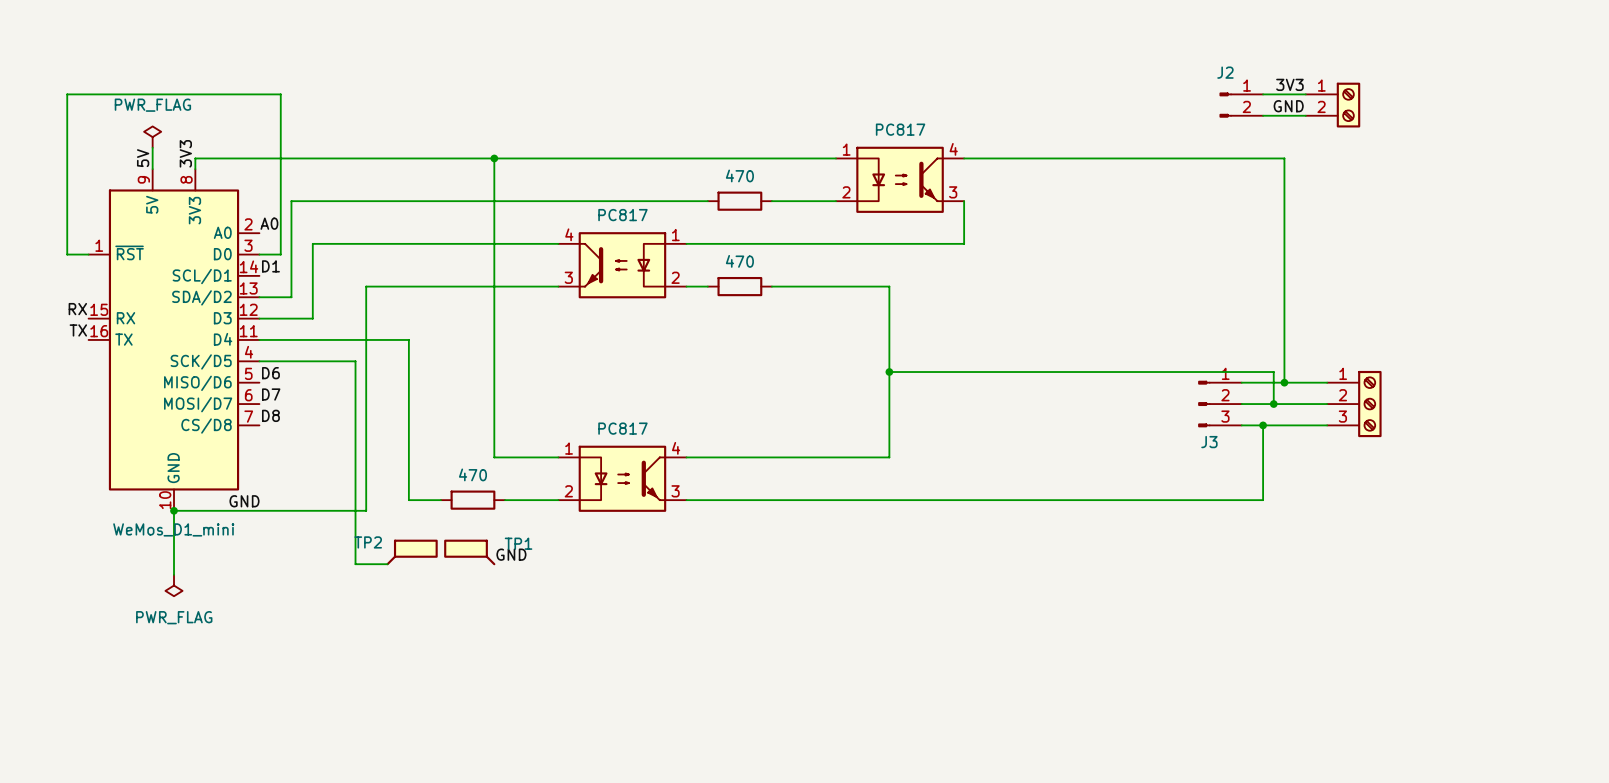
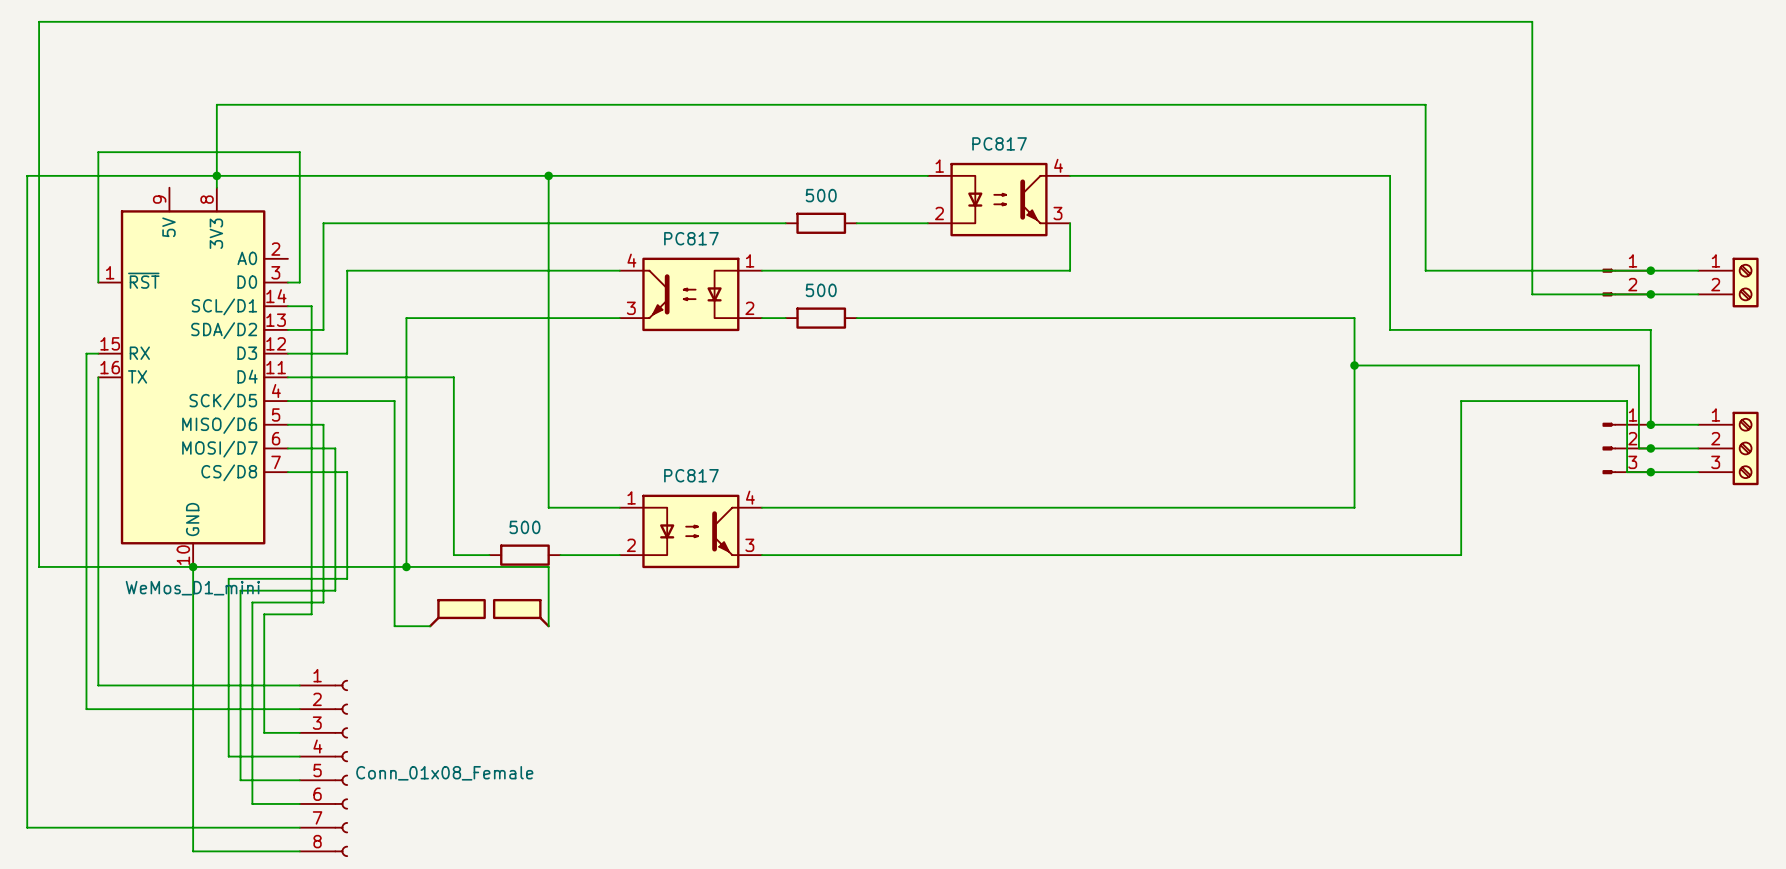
label: 3V3 (1289, 84) -> none
wire: (195, 94) (67, 94) (67, 254) (88, 254) -> (299, 282) (299, 152) (98, 152) (98, 282)
wire: none -> (216, 104) (216, 175) (27, 175) (27, 827) (299, 827)
wire: (280, 94) (280, 254) (270, 254) -> (311, 104) (1401, 104)
wire: (1284, 94) (1305, 94) -> (1425, 104) (1425, 175)
J2: (1241, 105) -> none
part: (1333, 105) -> none
label: GND (1288, 106) -> none
wire: (1263, 115) (1305, 115) -> none
power symbol: PWR_FLAG (152, 137) -> none
wire: (152, 147) (152, 169) -> none
label: 3V3 (185, 153) -> none
label: 5V (143, 158) -> none
junction: none -> (216, 175)
wire: (1252, 158) (1284, 158) -> (1390, 175) (1390, 329) (1650, 329) (1650, 424) (1698, 424)
part value: 470 (739, 175) -> 500 (821, 195)
label: A0 (269, 223) -> none
wire: (1284, 243) (1284, 382) -> (1425, 270) (1698, 270)
junction: none -> (1650, 270)
part: none -> (1626, 282)
part: none -> (1728, 282)
part value: 470 (739, 261) -> 500 (821, 290)
junction: none -> (1650, 294)
wire: none -> (1698, 294) (1532, 294) (1532, 21) (39, 21) (39, 566) (193, 566)
label: D1 (270, 266) -> none
wire: none -> (287, 306) (311, 306) (311, 614) (264, 614) (264, 732) (299, 732)
wire: (889, 286) (889, 457) -> (987, 318) (1354, 318) (1354, 507) (987, 507)
label: RX (77, 309) -> none
wire: none -> (98, 353) (86, 353) (86, 709) (299, 709)
wire: none -> (1354, 365) (1638, 365) (1638, 448) (1698, 448)
junction: none -> (1354, 365)
label: TX (78, 330) -> none
wire: none -> (98, 377) (98, 685) (299, 685)
wire: (889, 372) (1273, 372) (1273, 404) -> none
junction: (889, 372) -> none
label: D6 (270, 373) -> none
wire: none -> (287, 424) (323, 424) (323, 602) (252, 602) (252, 803) (299, 803)
wire: (1241, 382) (1327, 382) -> none
junction: (1284, 382) -> none
junction: none -> (1650, 424)
label: D7 (271, 394) -> none
wire: none -> (287, 448) (335, 448) (335, 590) (240, 590) (240, 780) (299, 780)
J3: (1220, 404) -> none
wire: (1241, 404) (1327, 404) -> none
junction: (1273, 404) -> none
part position: (1354, 404) -> (1728, 448)
part: none -> (1626, 448)
junction: none -> (1650, 448)
label: D8 (270, 415) -> none
wire: none -> (287, 472) (347, 472) (347, 578) (228, 578) (228, 756) (299, 756)
wire: (1241, 425) (1327, 425) -> none
wire: (1263, 425) (1263, 500) -> (1698, 472) (1627, 472) (1627, 401) (1461, 401) (1461, 555) (1401, 555)
junction: (1263, 425) -> none
junction: none -> (1650, 472)
part value: 470 (472, 474) -> 500 (524, 527)
label: GND (244, 501) -> none
wire: none -> (406, 566) (548, 566) (548, 626)
junction: none -> (406, 566)
TP2 name: TP2 (368, 542) -> none
TP1 name: TP1 (518, 543) -> none
label: GND (511, 554) -> none
wire: none -> (193, 638) (193, 851) (299, 851)
power symbol: PWR_FLAG (174, 585) -> none
part: none -> Conn_01x08_Female (323, 768)

